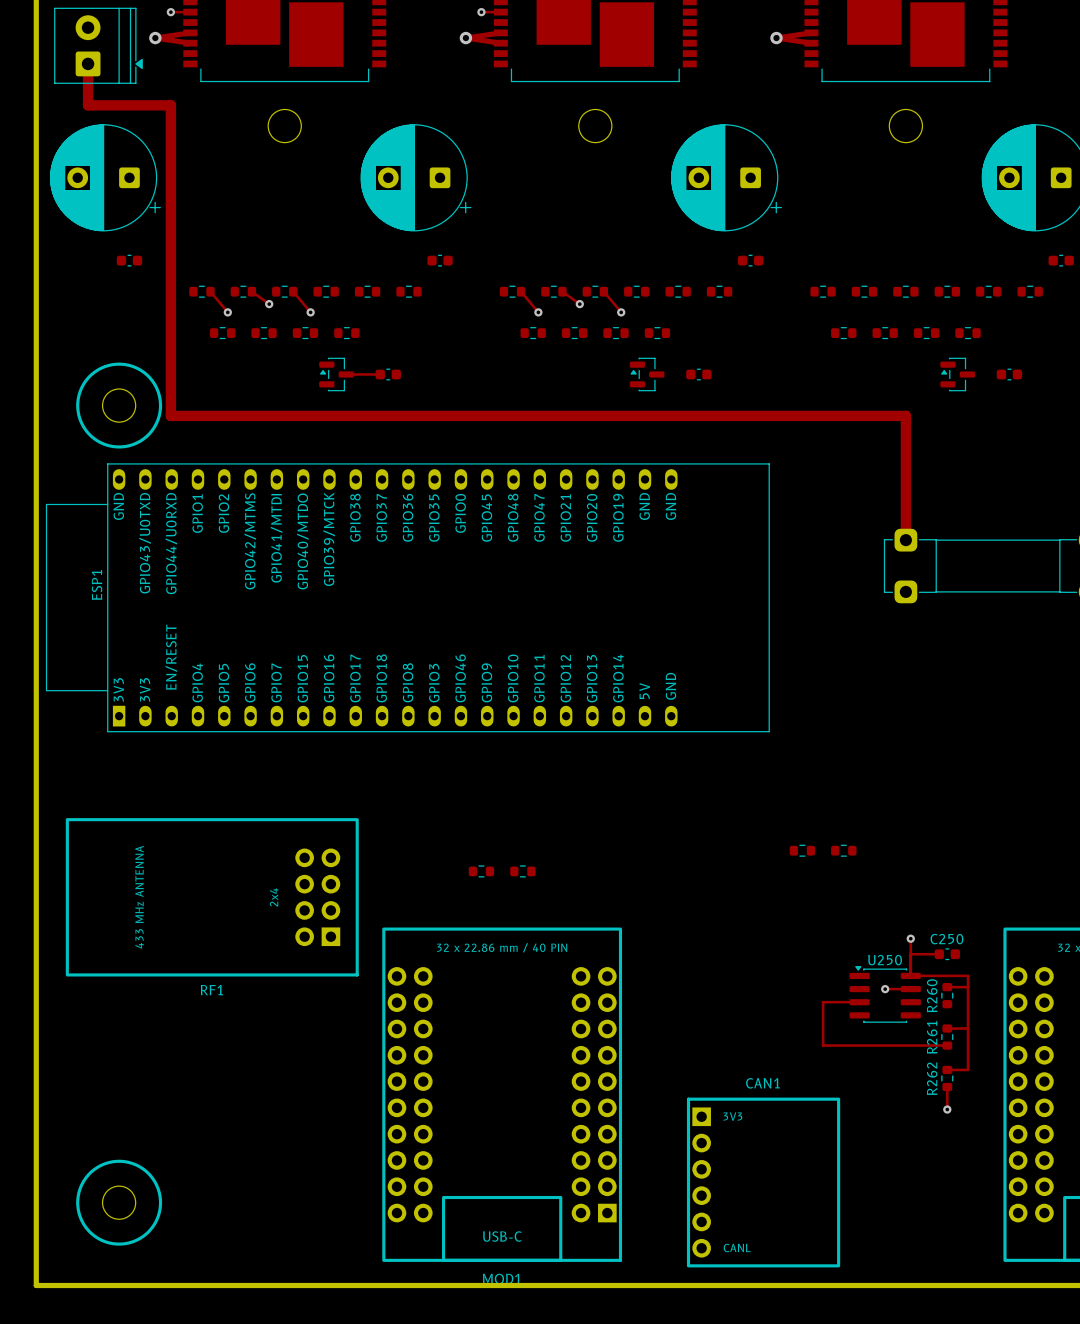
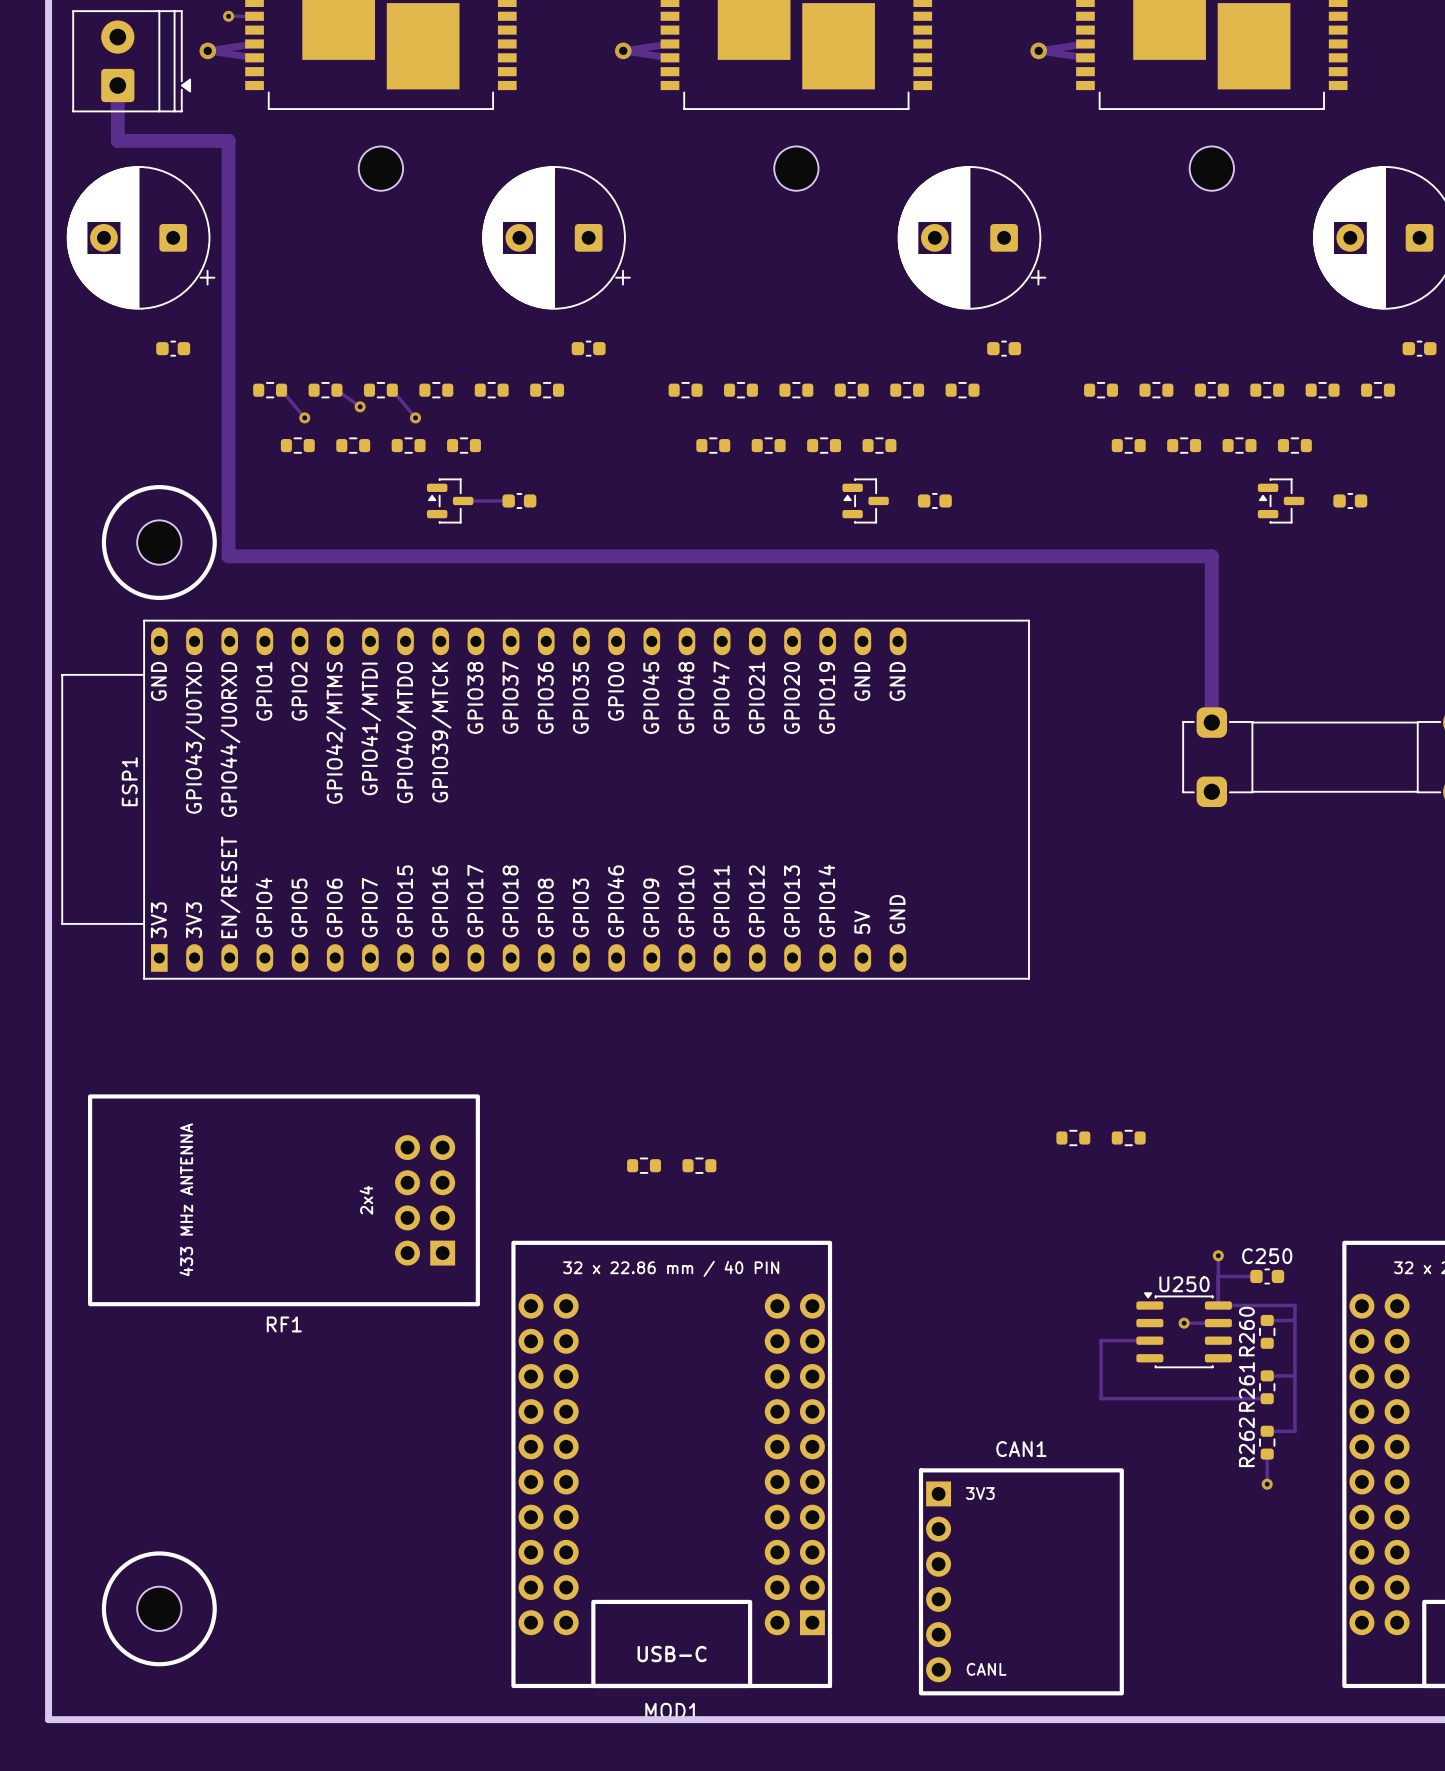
track: (481, 12) (500, 12) -> none
via: (481, 12) -> none
track: (521, 291) (538, 312) -> none
track: (562, 291) (579, 304) -> none
track: (603, 291) (621, 312) -> none
via: (579, 304) -> none
via: (538, 312) -> none
via: (621, 312) -> none

